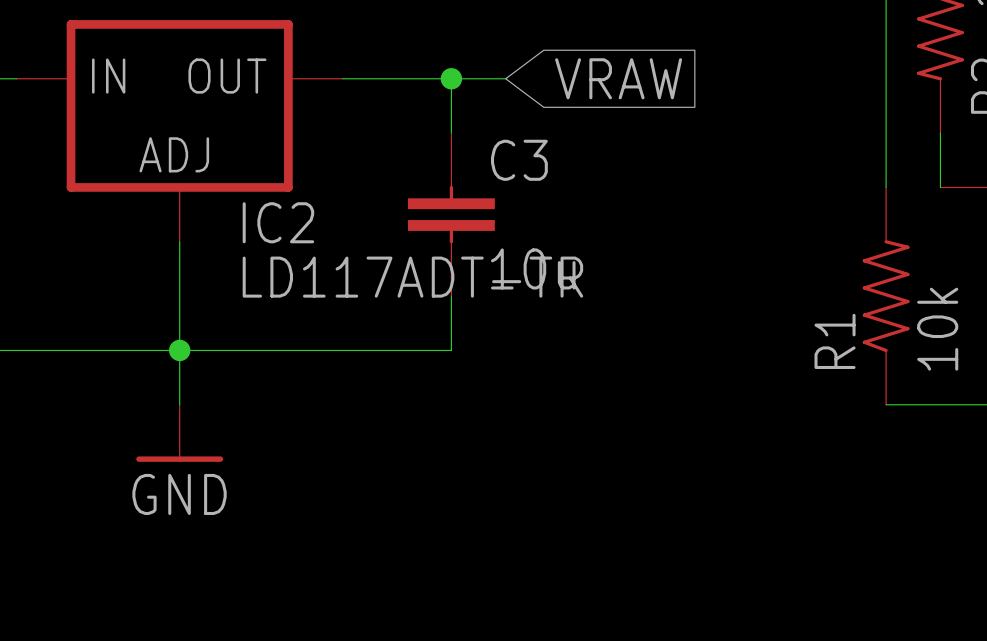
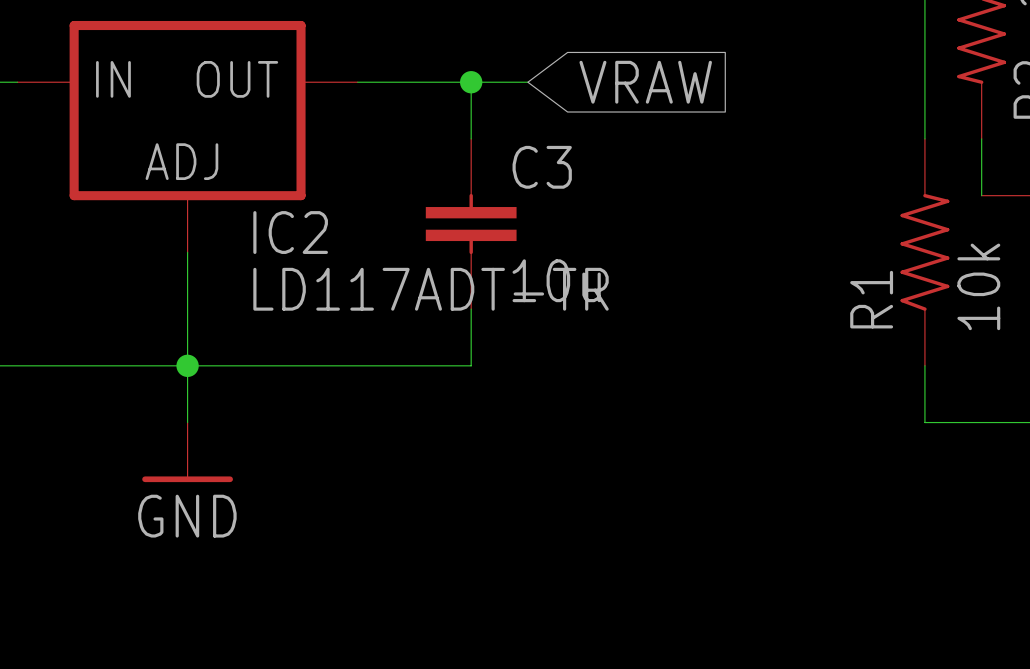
R1 position: (886, 296) -> (924, 252)

